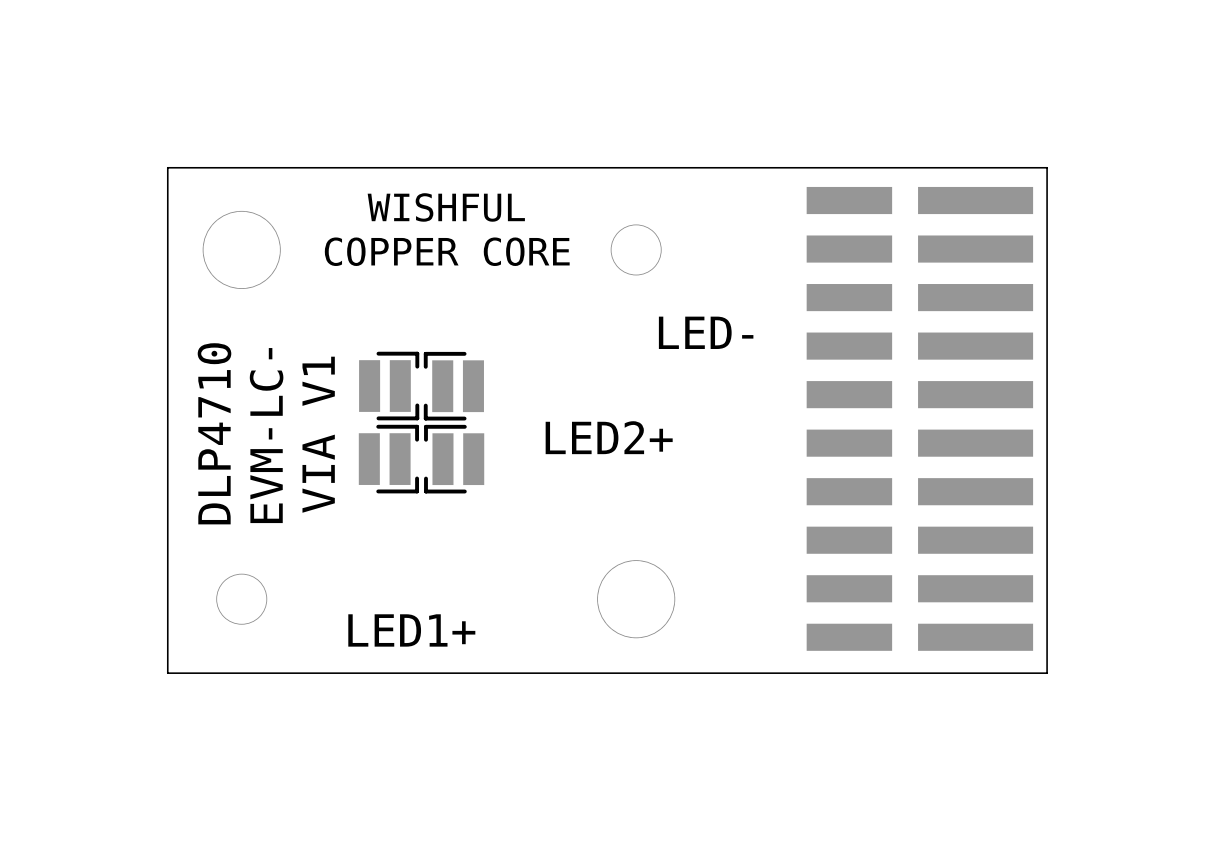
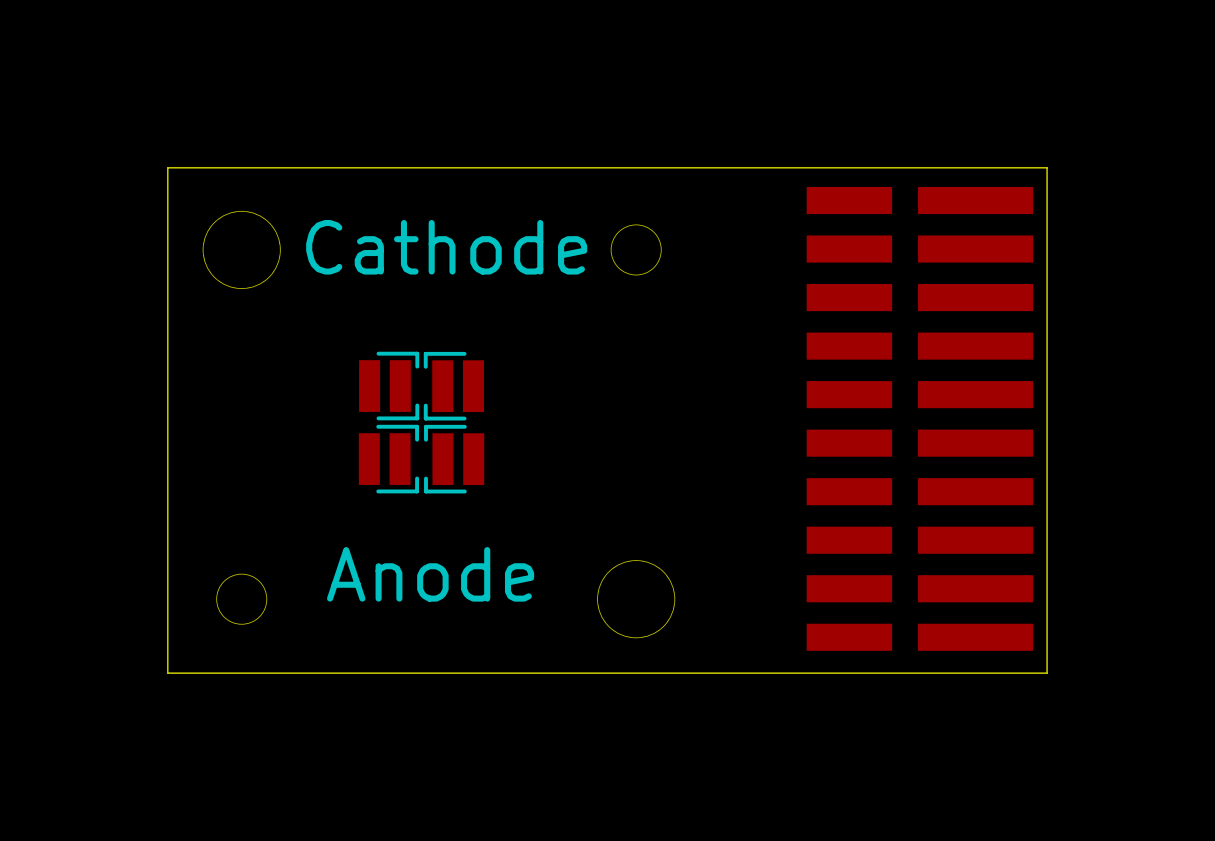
text: WISHFUL (446, 207) -> none
text: none -> Cathode (446, 247)
text: COPPER CORE (447, 251) -> none
text: LED- (706, 332) -> none
text: DLP4710 (214, 433) -> none
text: VIA V1 (318, 434) -> none
text: EVM-LC- (266, 435) -> none
text: LED2+ (609, 437) -> none
text: none -> Anode (430, 574)
text: LED1+ (411, 630) -> none

